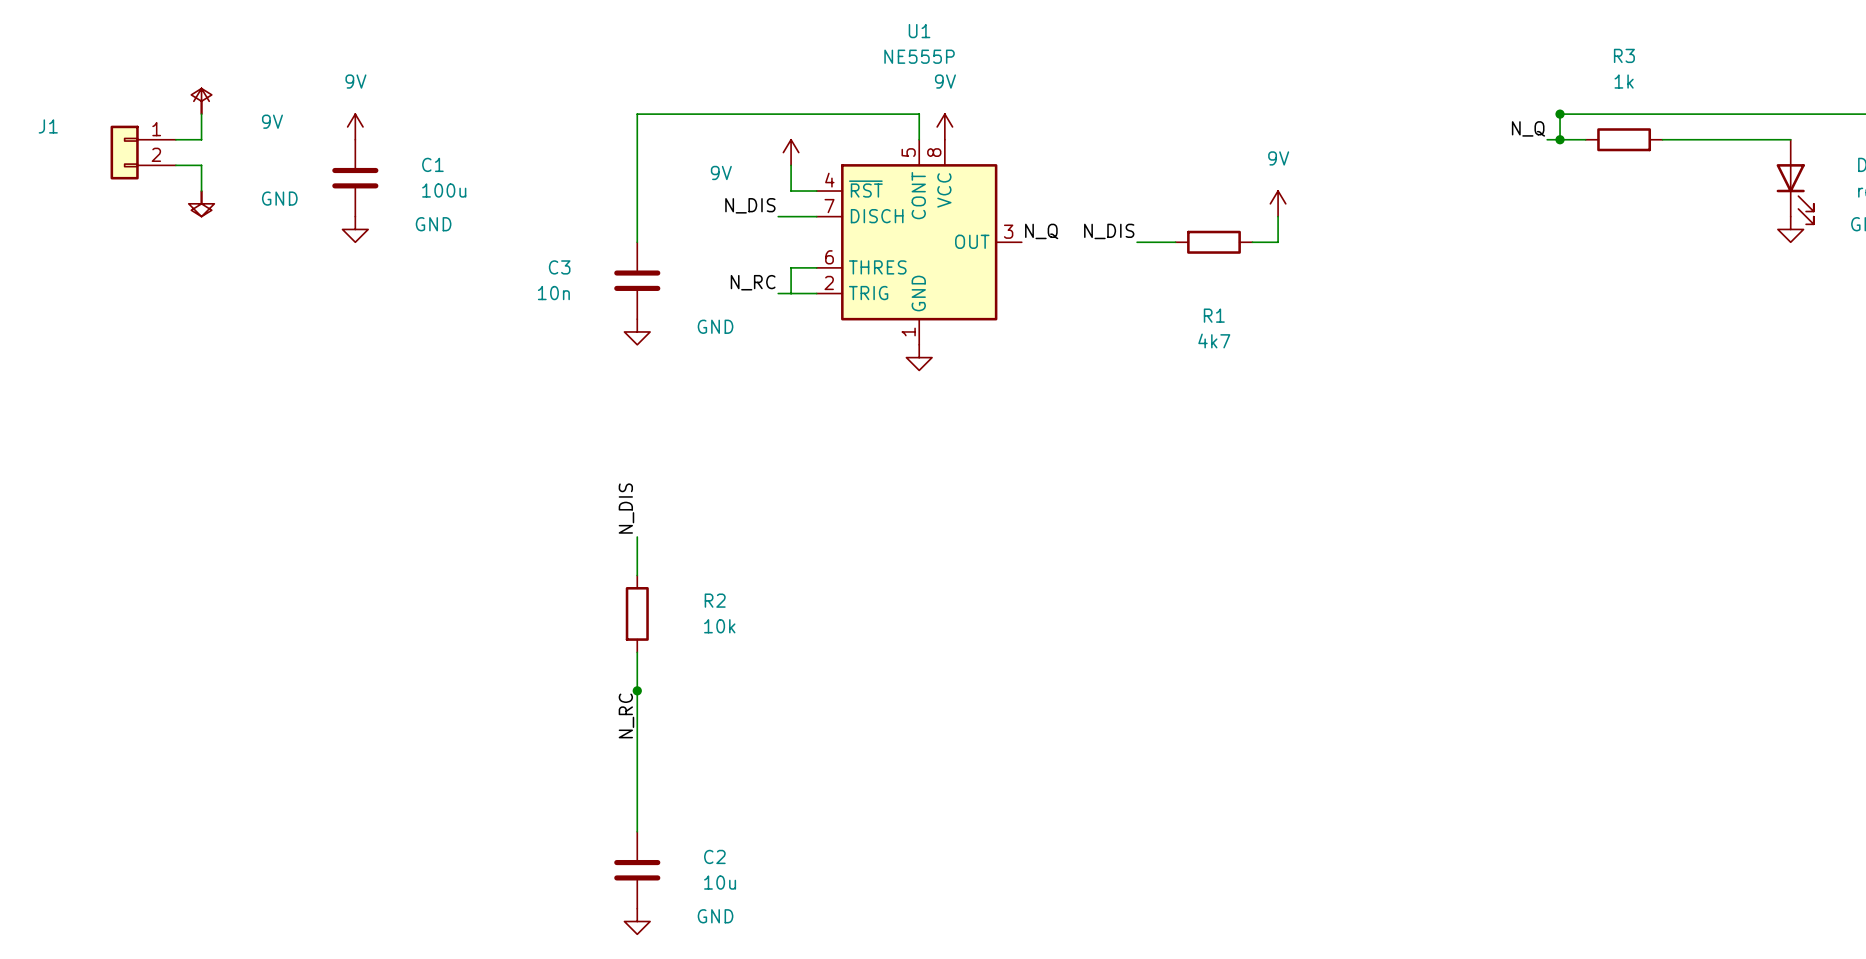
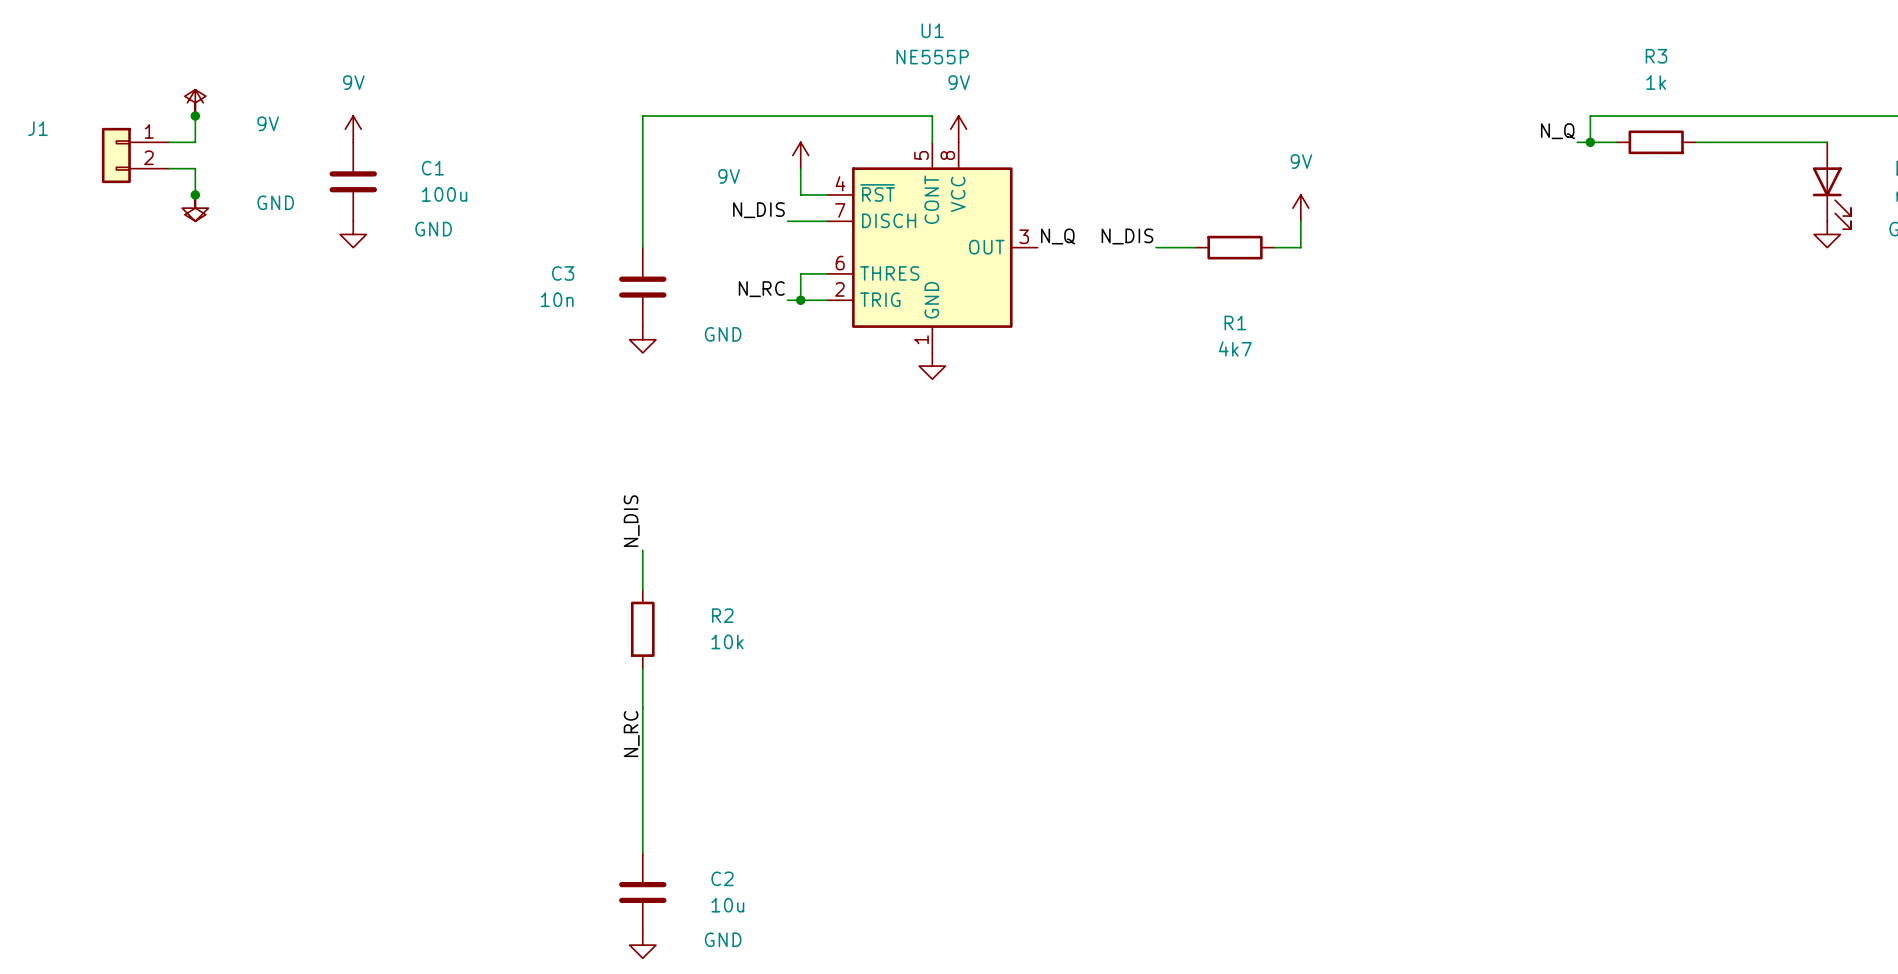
junction: none -> (195, 116)
junction: (1560, 114) -> none
junction: none -> (195, 194)
junction: none -> (800, 300)
junction: (637, 690) -> none

